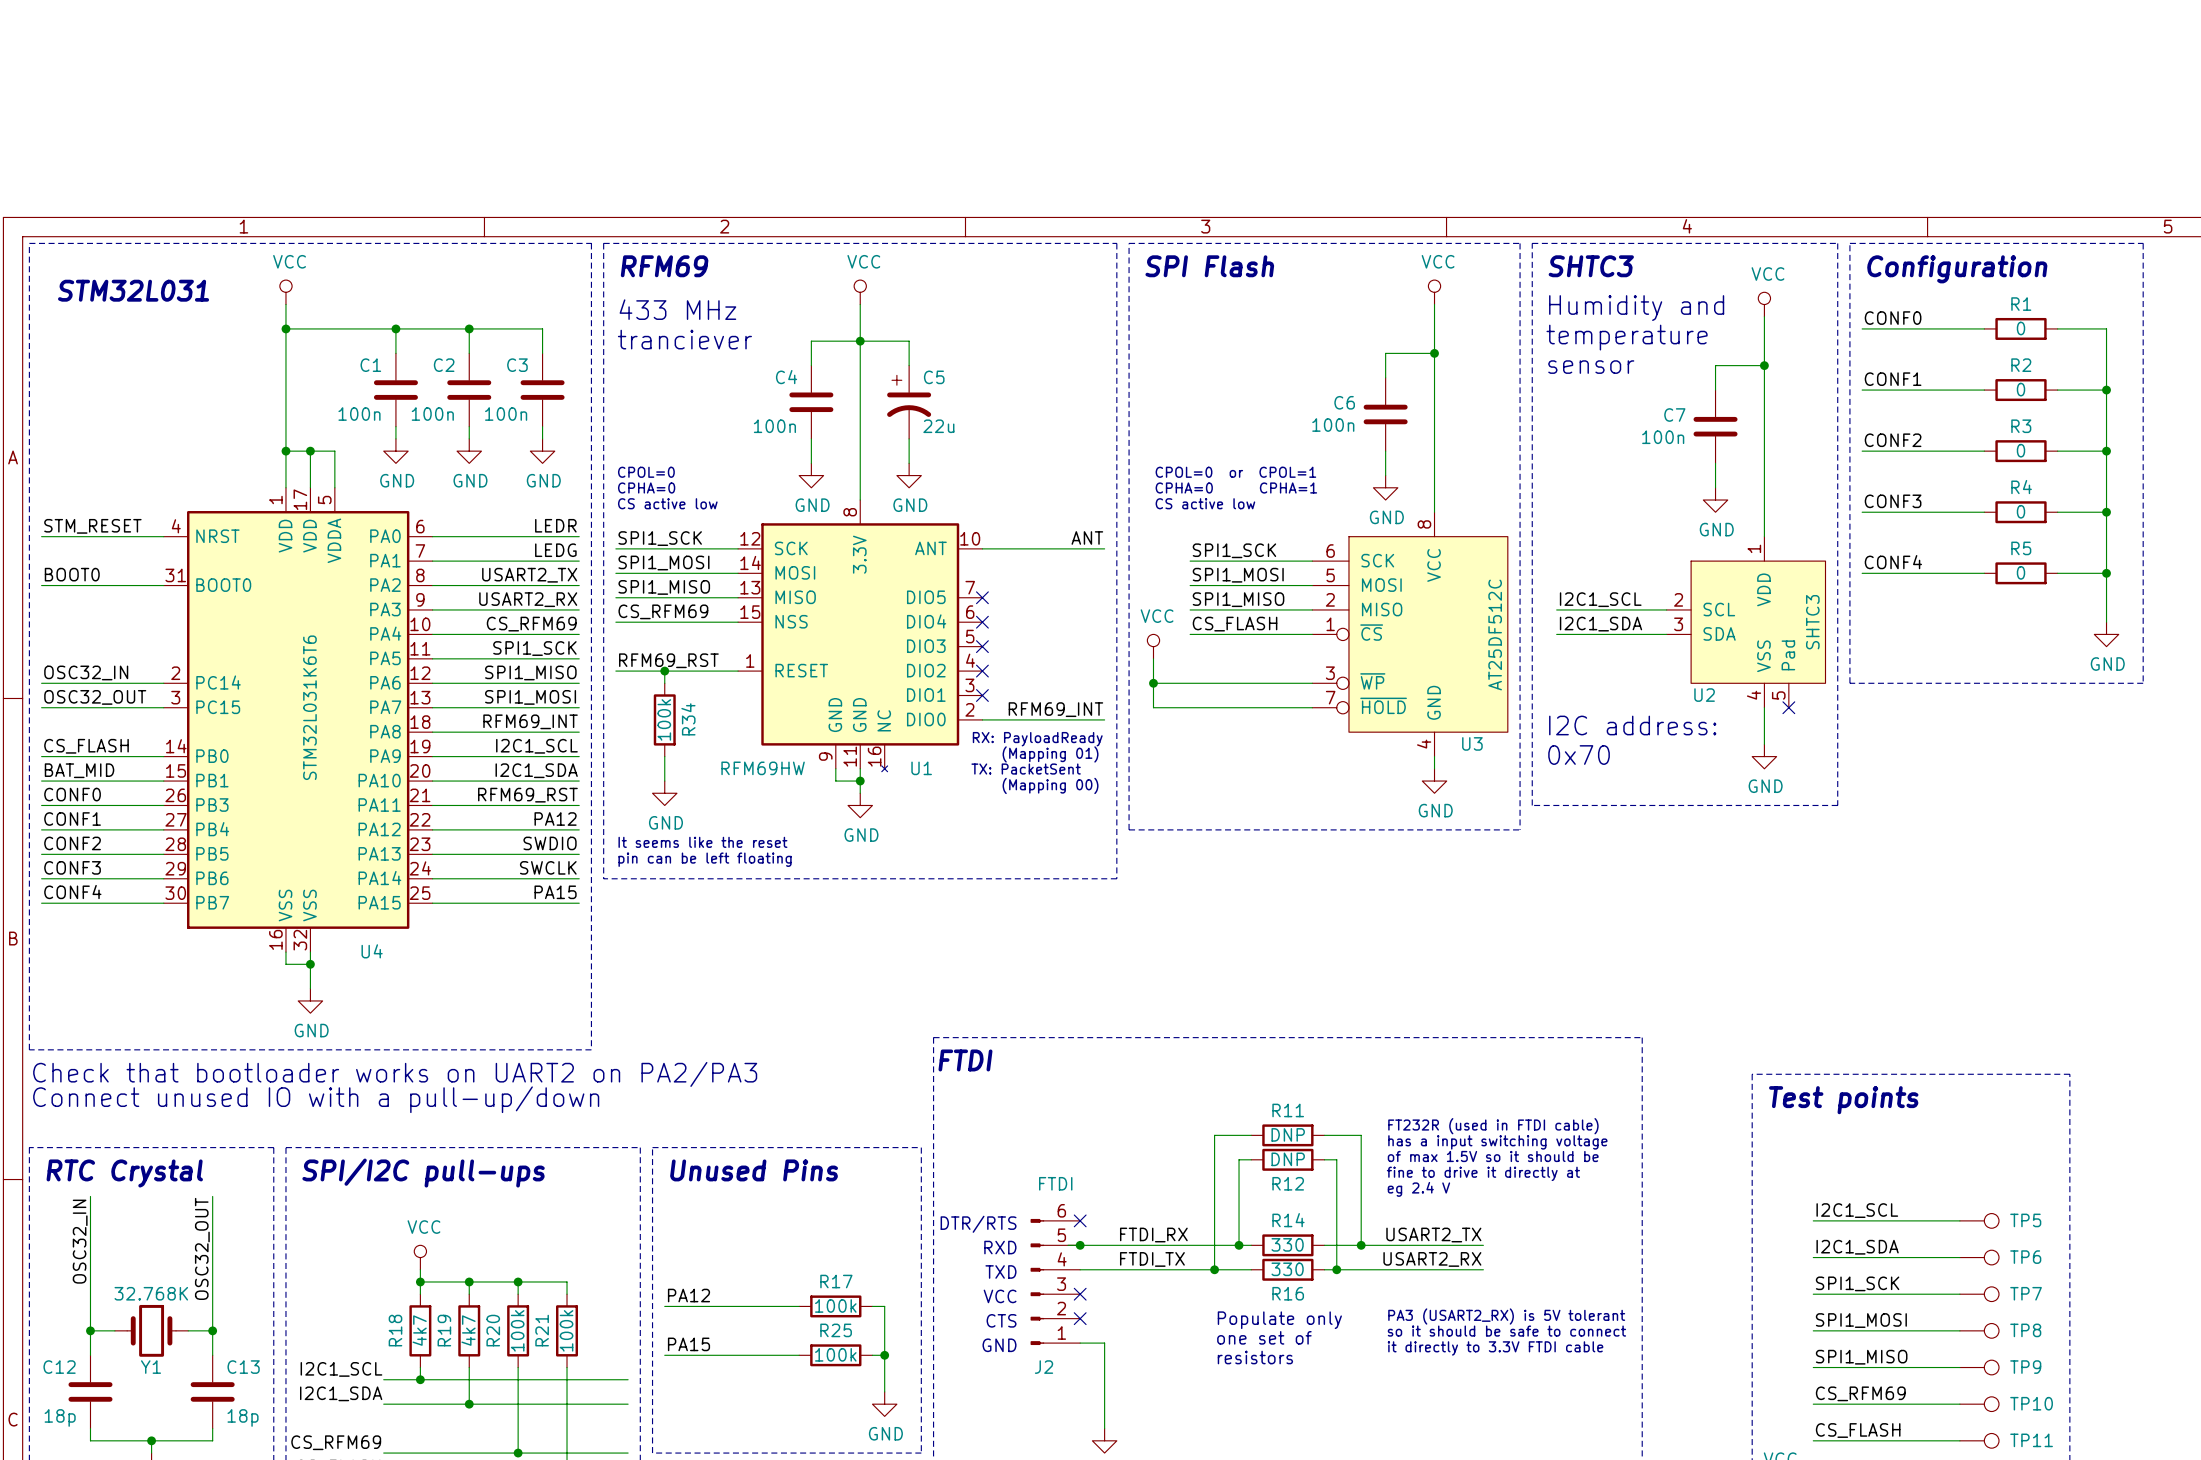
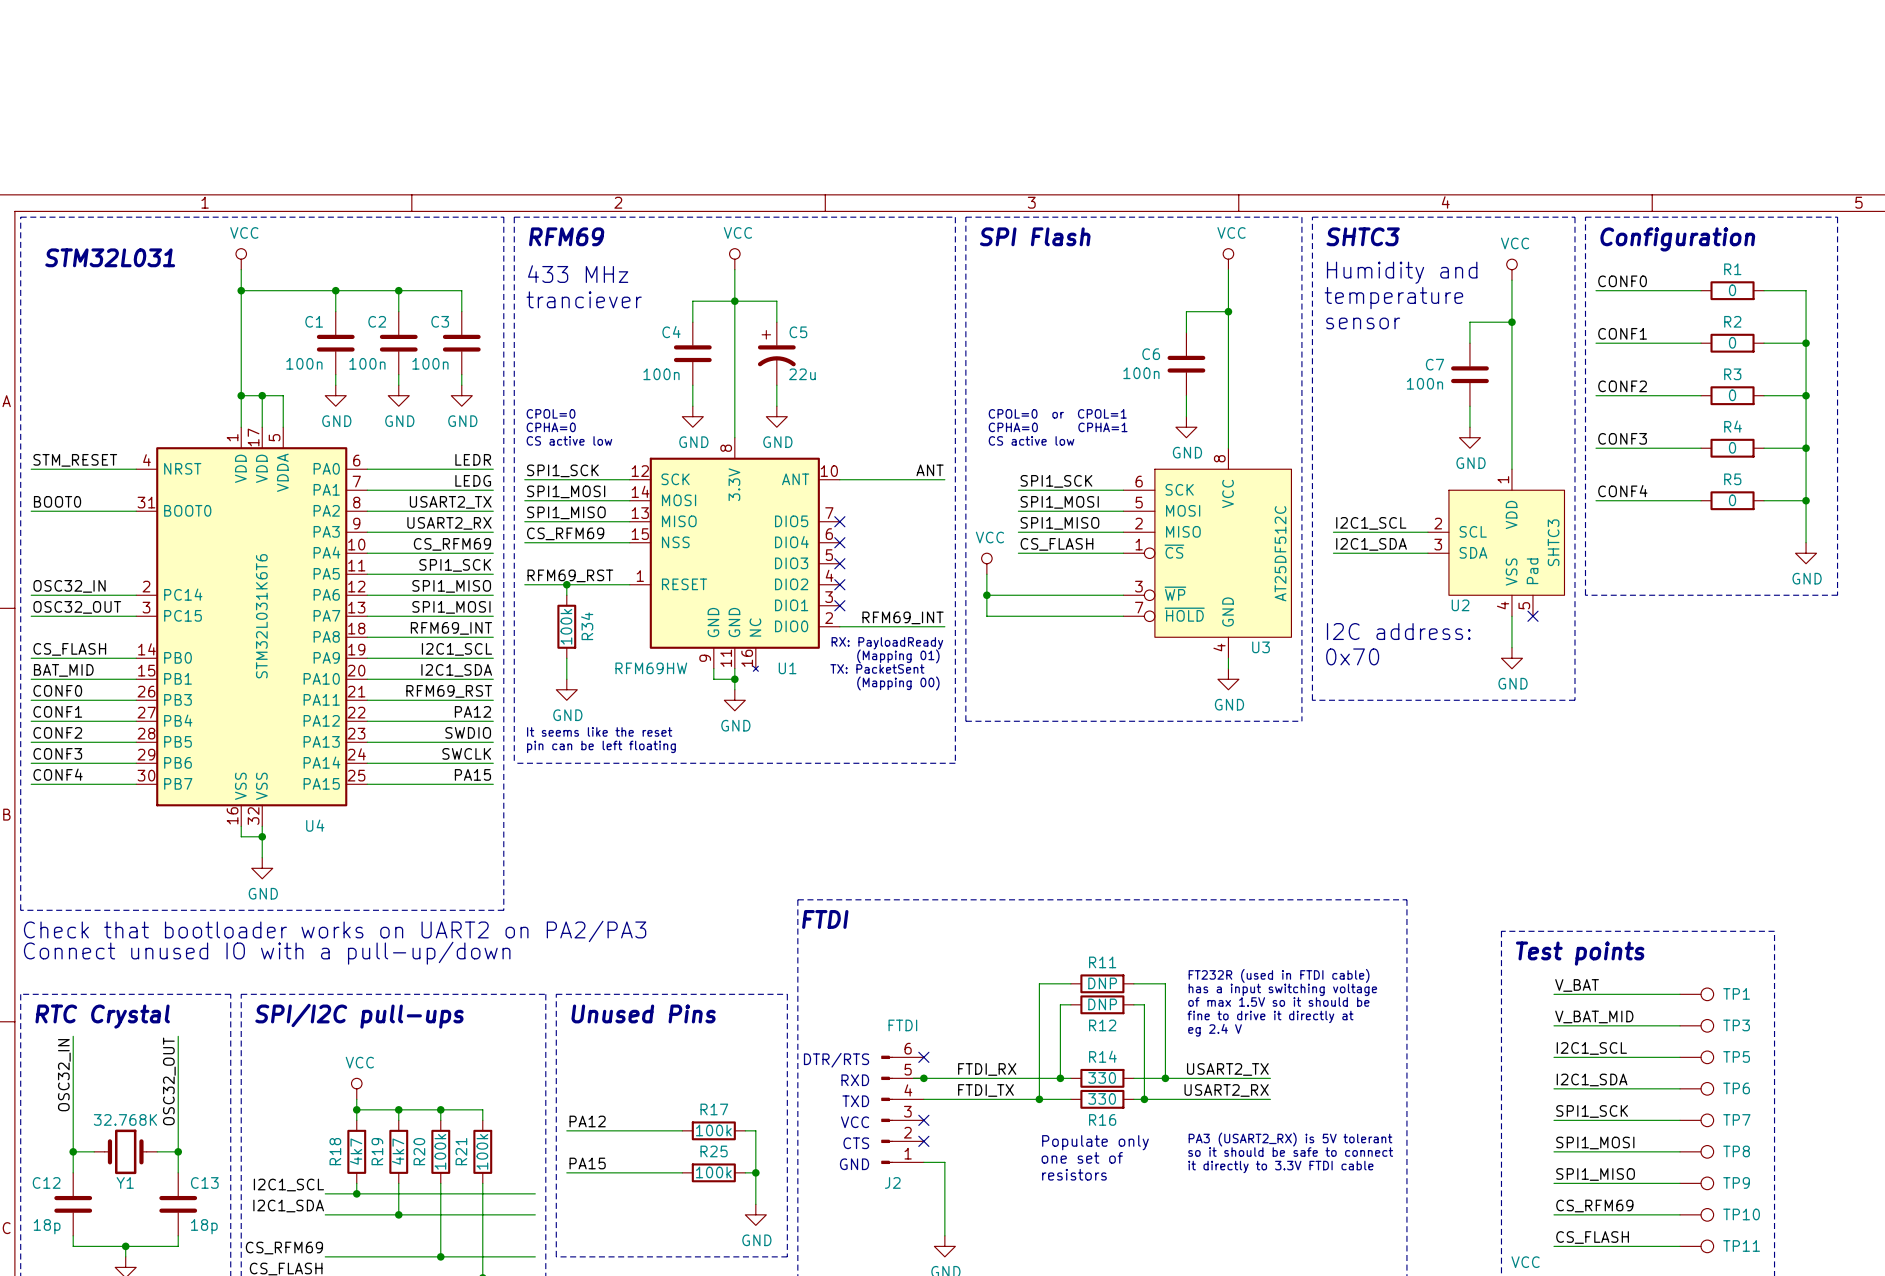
label: none -> V_BAT (1577, 985)
wire: none -> (1553, 994) (1680, 994)
TP1: none -> (1696, 994)
label: none -> V_BAT_MID (1594, 1016)
wire: none -> (1553, 1025) (1680, 1025)
TP3: none -> (1696, 1025)

